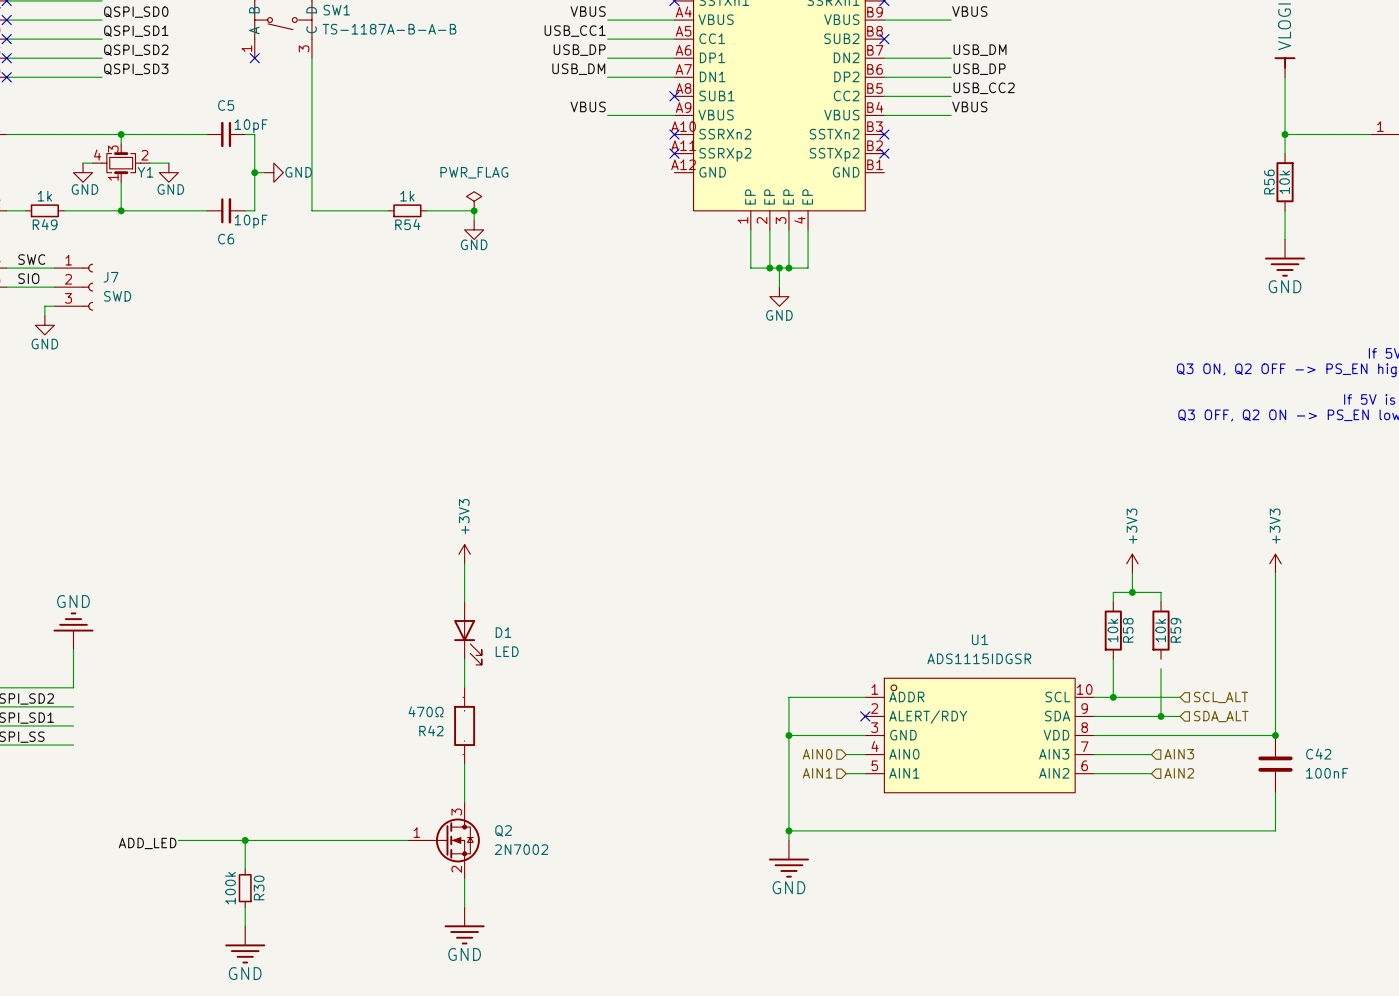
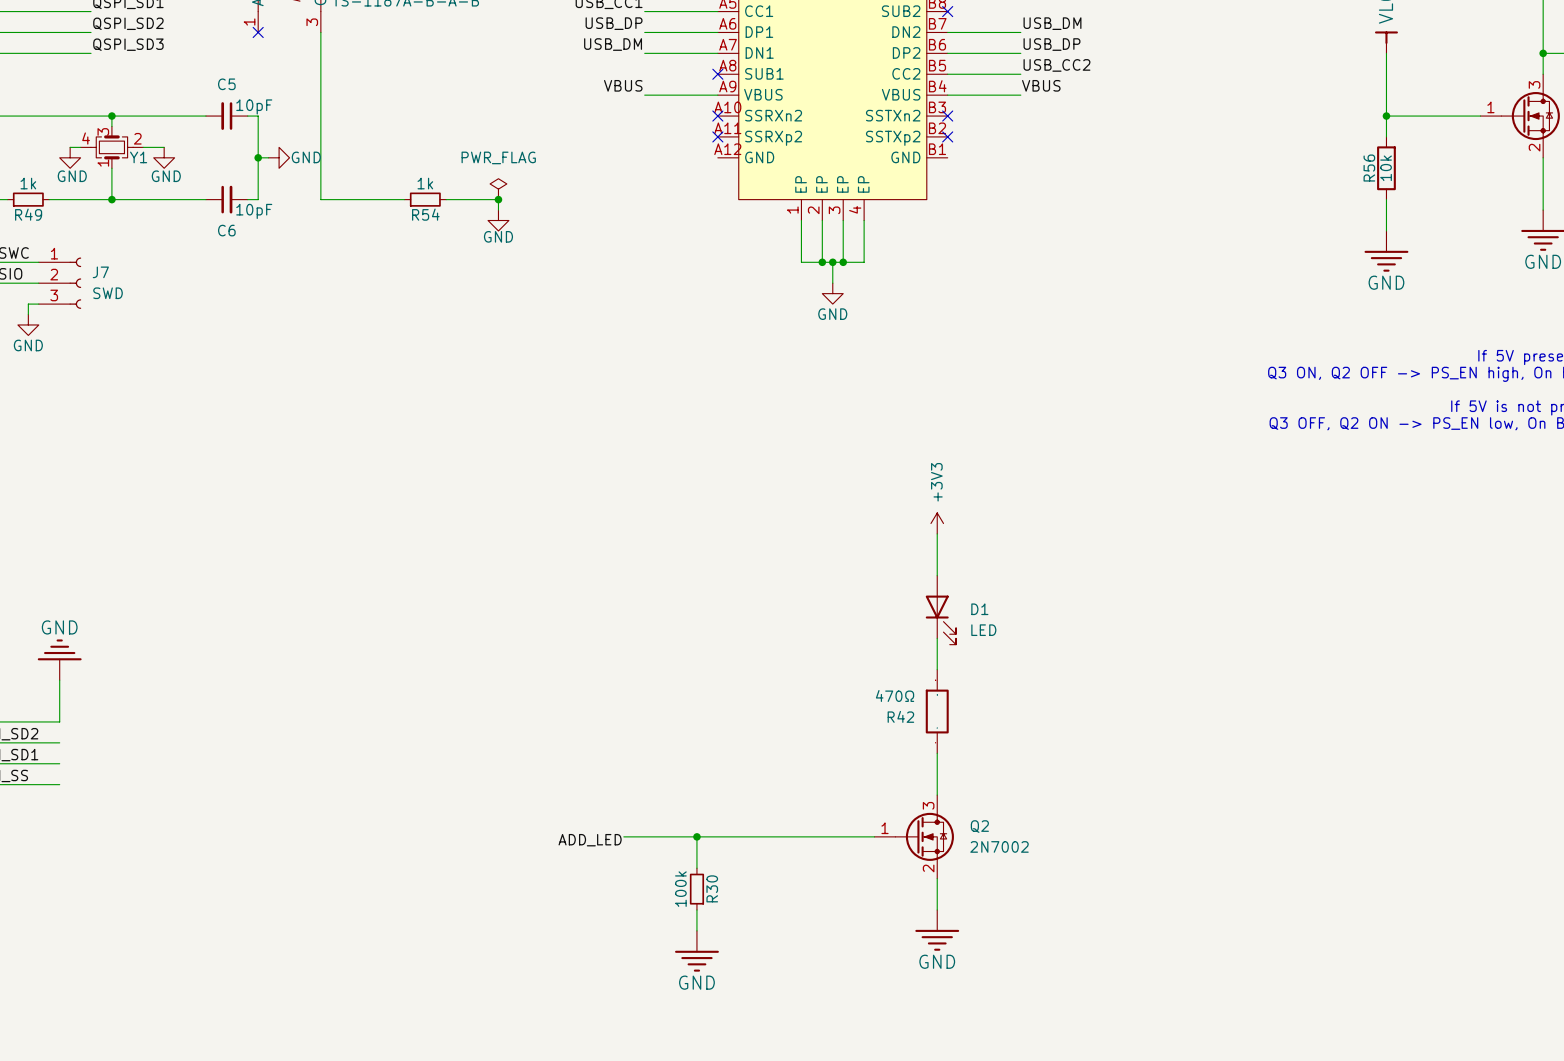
power symbol: none -> +3V3 (937, 523)
wire: none -> (937, 533) (937, 575)
power symbol: +3V3 (464, 554) -> none
wire: (464, 563) (464, 601) -> none
power symbol: +3V3 (1132, 563) -> none
power symbol: +3V3 (1275, 563) -> none
wire: (1132, 573) (1132, 592) -> none
wire: (1275, 573) (1275, 735) (1094, 735) -> none
junction: (1132, 592) -> none
wire: (1113, 601) (1113, 592) (1161, 592) (1161, 601) -> none
wire: none -> (937, 638) (937, 669)
R58: 10k (1113, 630) -> none
R59: 10k (1161, 630) -> none
D1 position: (467, 633) -> (940, 610)
wire: (464, 659) (464, 687) -> none
wire: (1113, 659) (1113, 697) -> none
wire: (1161, 668) (1161, 716) -> none
wire: (865, 697) (788, 697) (788, 840) -> none
wire: (1094, 697) (1180, 697) -> none
junction: (1113, 697) -> none
hierarchical label: SCL_ALT (1221, 697) -> none
no-connect mark: (865, 716) -> none
wire: none -> (937, 753) (937, 795)
wire: (1094, 716) (1180, 716) -> none
junction: (1161, 716) -> none
hierarchical label: SDA_ALT (1221, 716) -> none
R42 position: (464, 725) -> (937, 711)
wire: (788, 735) (865, 735) -> none
junction: (788, 735) -> none
U1: ADS1115IDGSR (979, 735) -> none
junction: (1275, 735) -> none
hierarchical label: AIN0 (817, 754) -> none
wire: (846, 754) (865, 754) -> none
wire: (1094, 754) (1151, 754) -> none
hierarchical label: AIN3 (1179, 754) -> none
wire: (464, 764) (464, 802) -> none
C42: 100nF (1275, 764) -> none
hierarchical label: AIN1 (817, 773) -> none
wire: (846, 773) (865, 773) -> none
wire: (1094, 773) (1151, 773) -> none
hierarchical label: AIN2 (1179, 773) -> none
wire: none -> (623, 836) (874, 836)
wire: none -> (696, 836) (696, 868)
junction: none -> (696, 836)
wire: (1275, 792) (1275, 830) (788, 830) -> none
label: none -> ADD_LED (590, 840)
junction: (788, 830) -> none
wire: none -> (937, 878) (937, 910)
wire: (178, 840) (407, 840) -> none
wire: (245, 840) (245, 869) -> none
junction: (245, 840) -> none
Q2 position: (443, 840) -> (914, 836)
label: ADD_LED (147, 843) -> none
wire: none -> (696, 910) (696, 930)
power symbol: GND (788, 859) -> none
wire: (464, 878) (464, 907) -> none
power symbol: none -> GND (937, 930)
R30 position: (245, 888) -> (696, 889)
power symbol: none -> GND (696, 951)
wire: (245, 907) (245, 926) -> none
power symbol: GND (464, 925) -> none
power symbol: GND (245, 944) -> none

